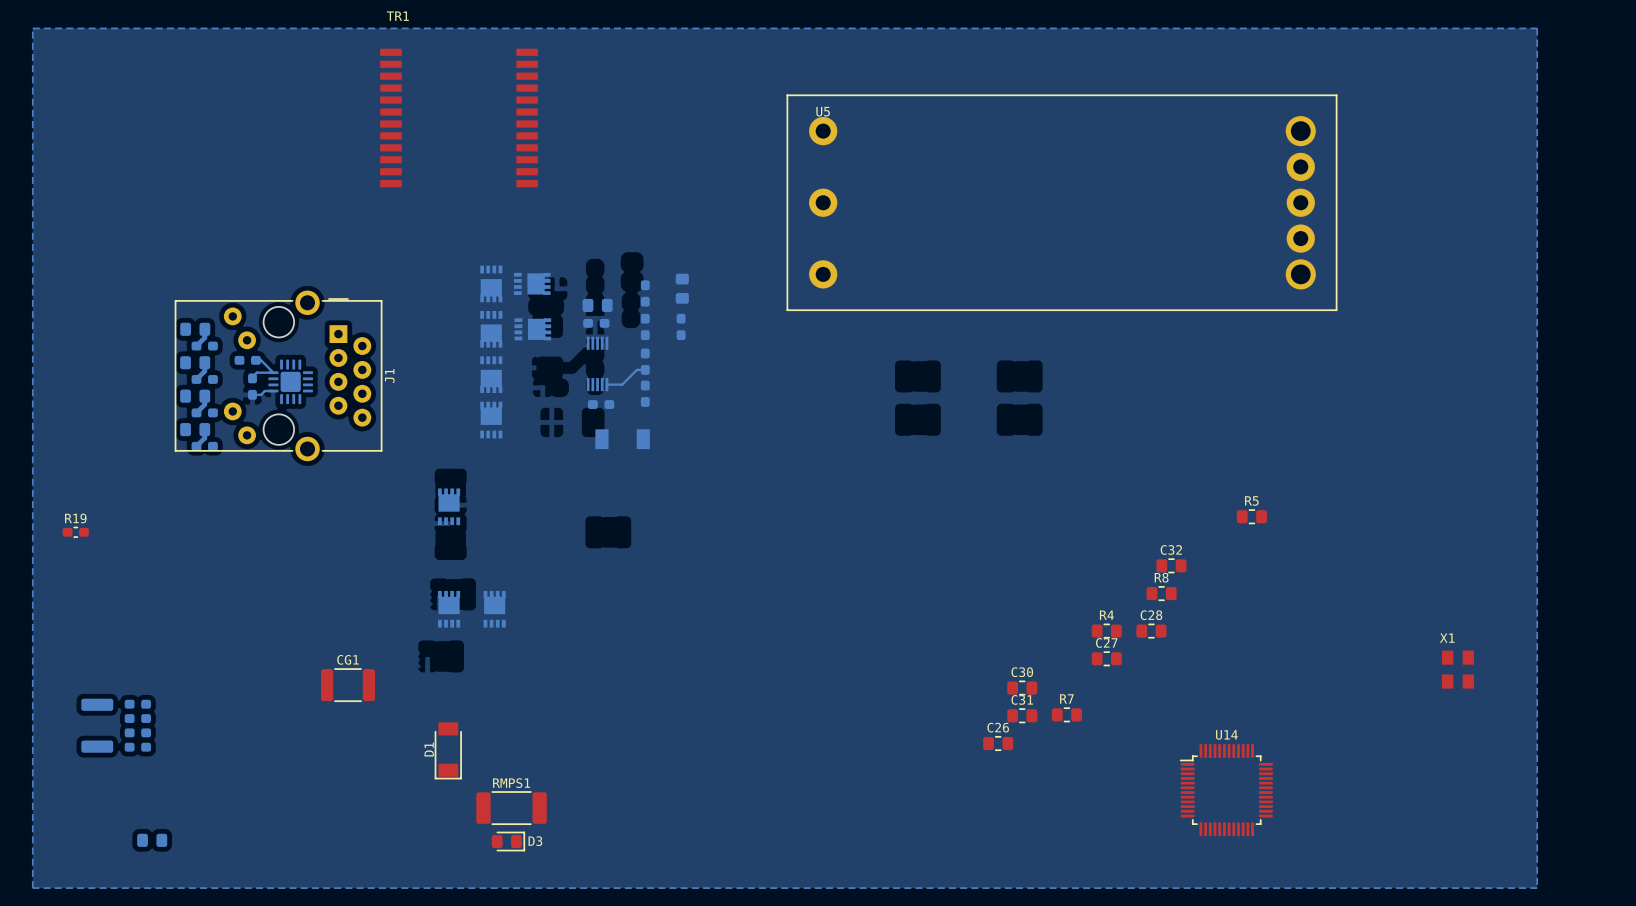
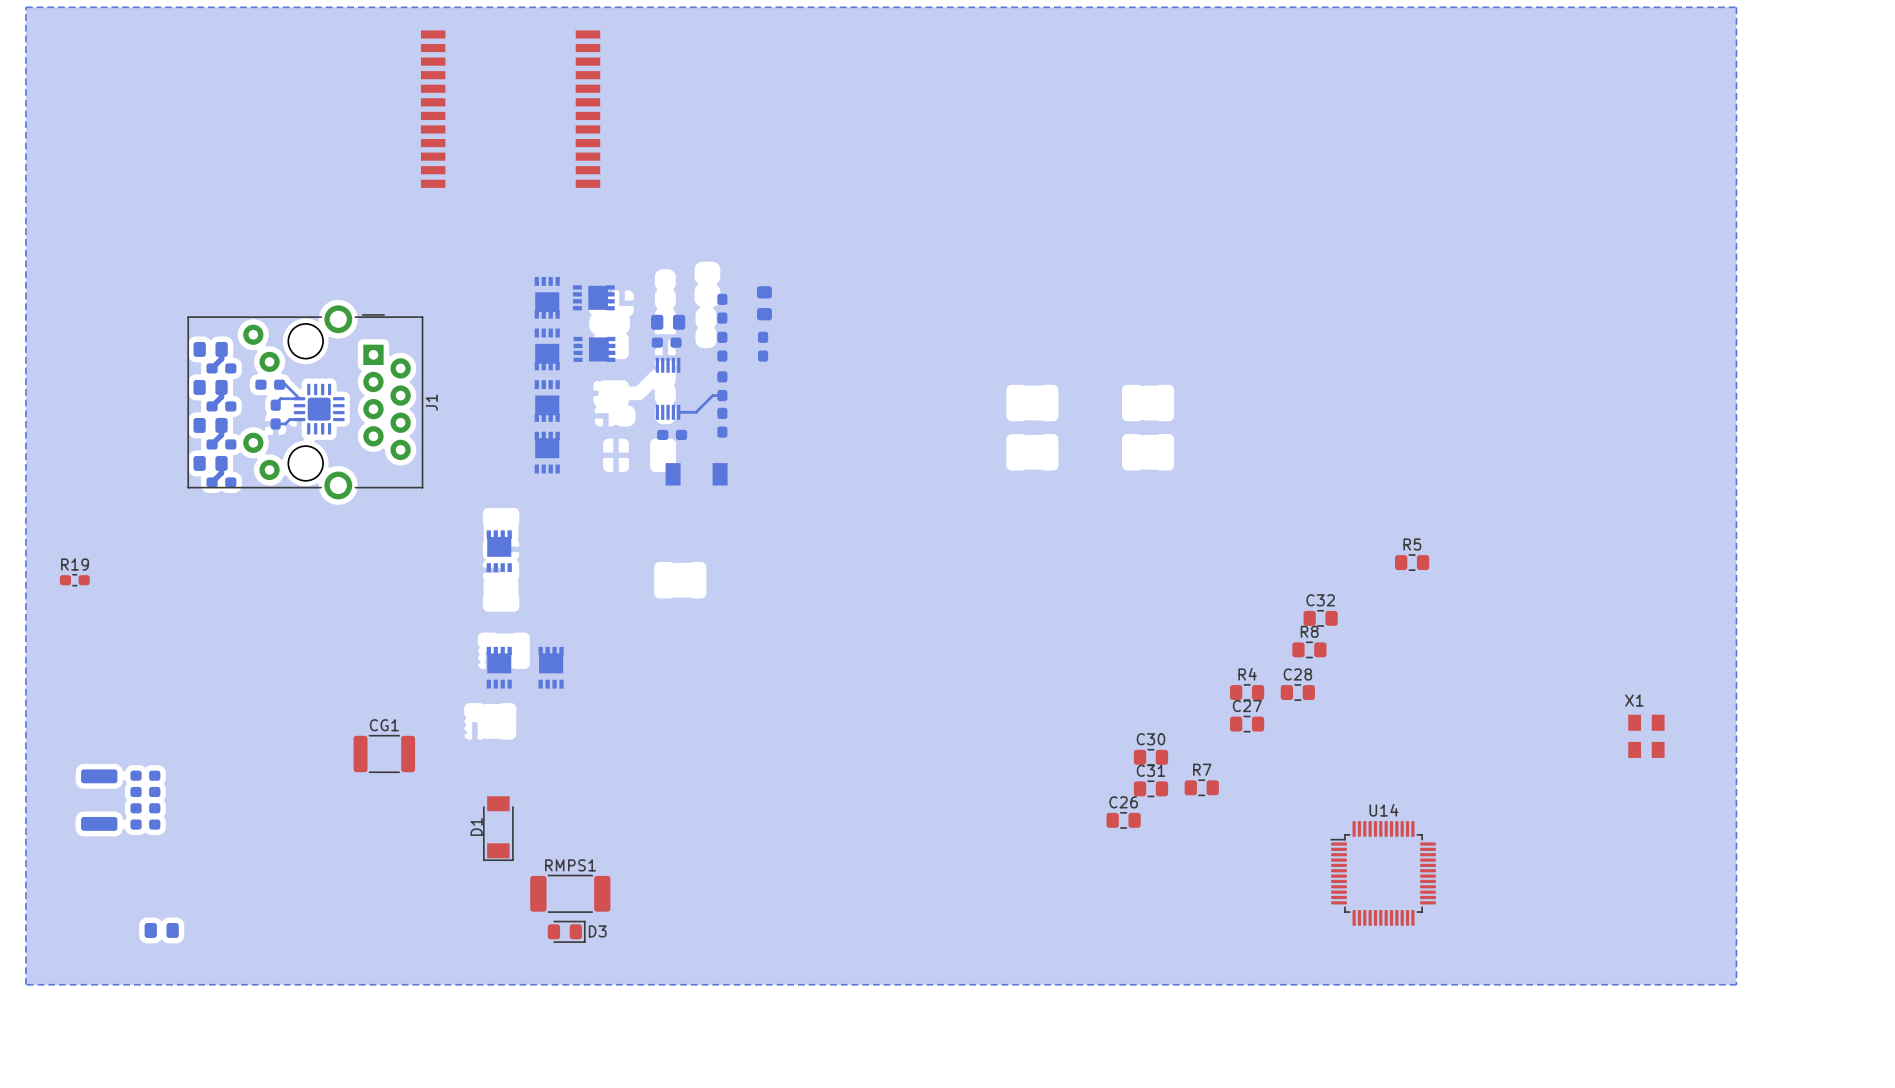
U5: (1061, 202) -> none

